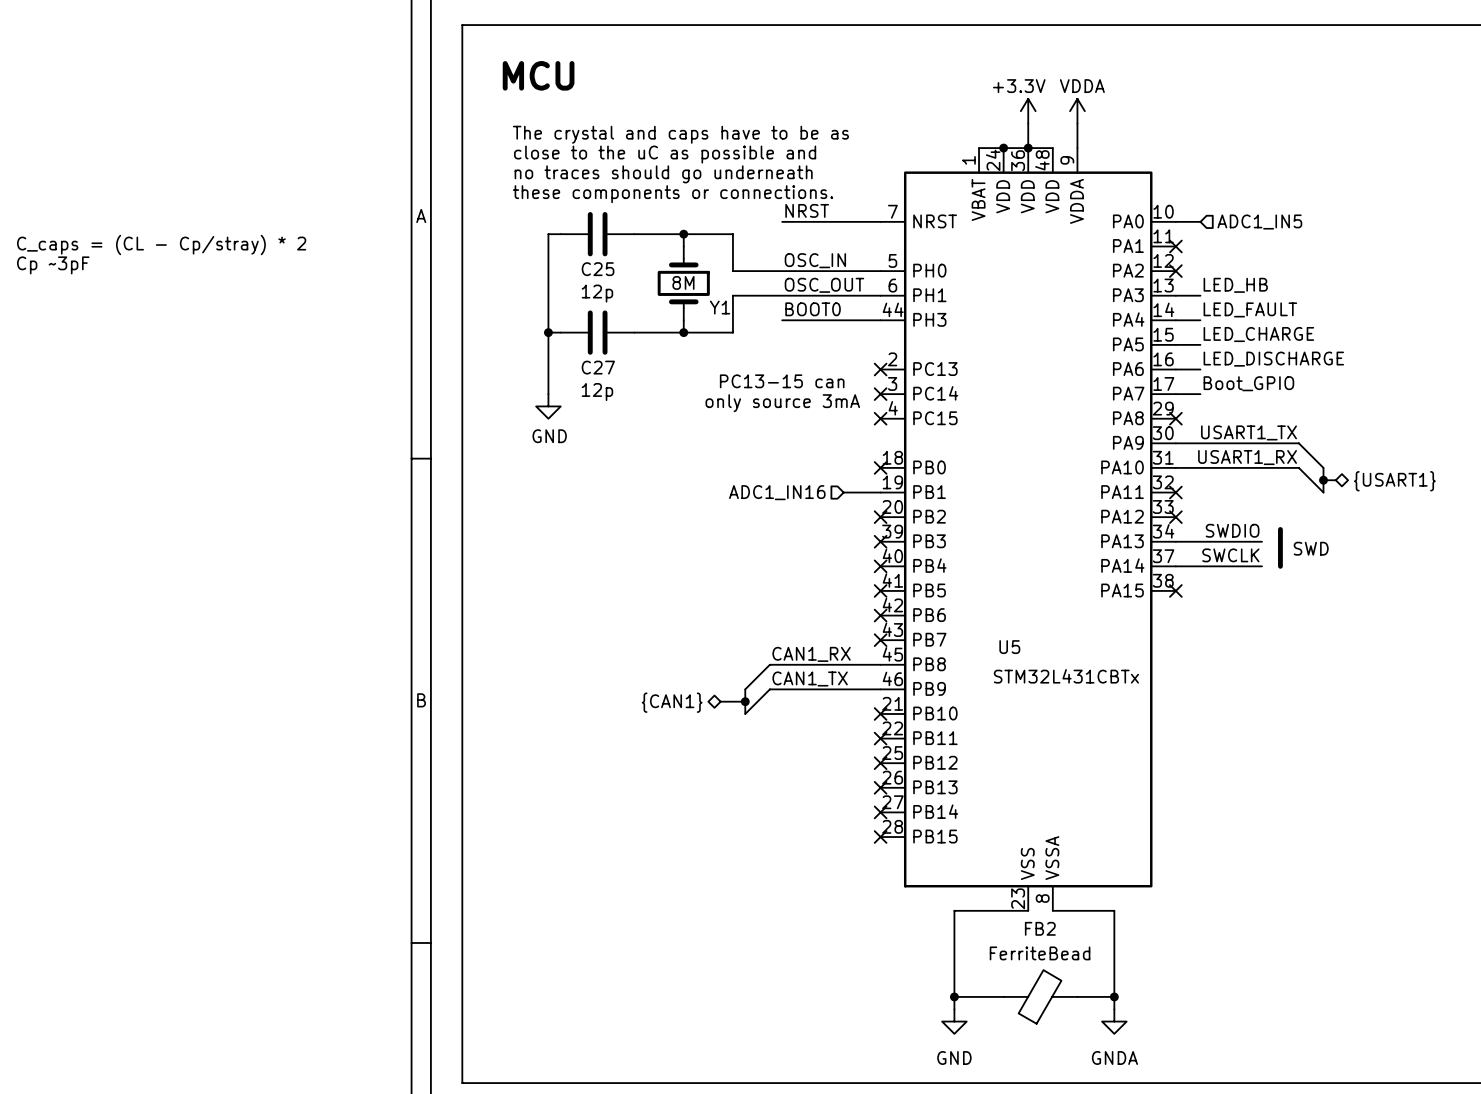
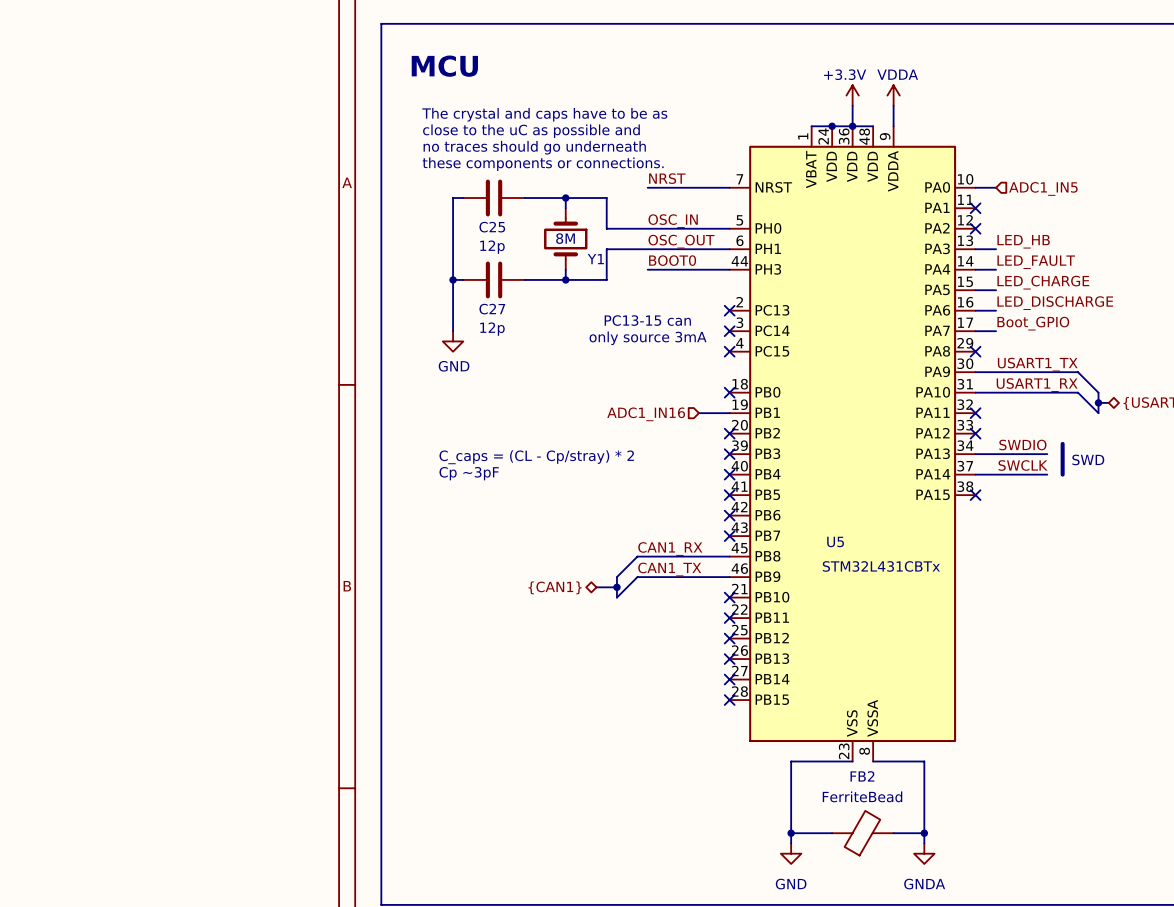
text: C_caps = (CL - Cp/stray) * 2 (161, 245) -> none
text: Cp ~3pF (53, 265) -> none
text: none -> C_caps = (CL - Cp/stray) * 2 (536, 457)
text: none -> Cp ~3pF (469, 473)

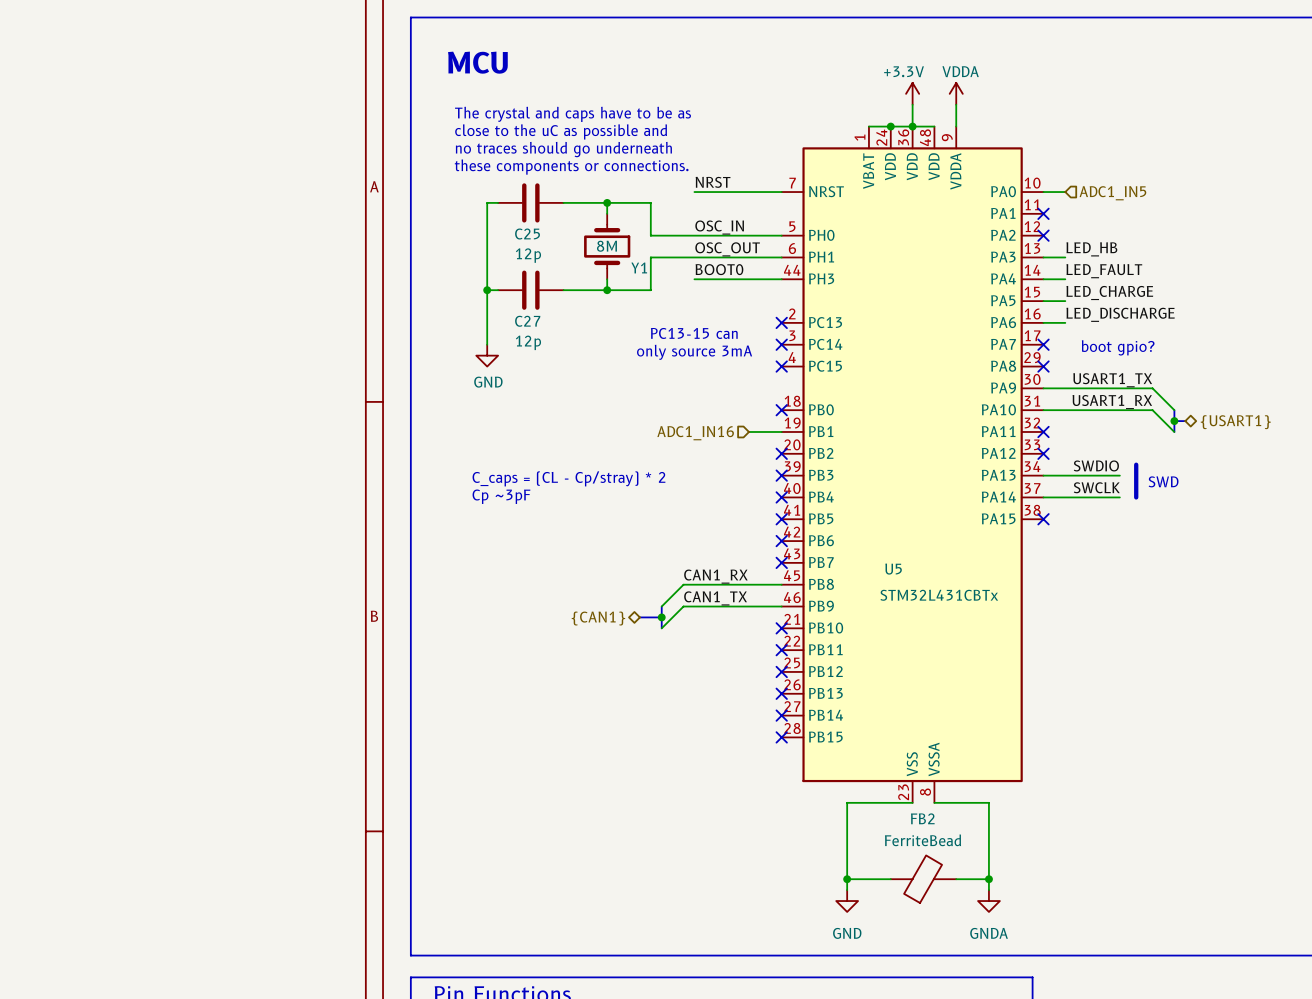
label: Boot_GPIO (1033, 323) -> none
wire: (975, 331) (996, 331) -> none
no-connect mark: none -> (1043, 344)
text: none -> boot gpio? (1118, 347)

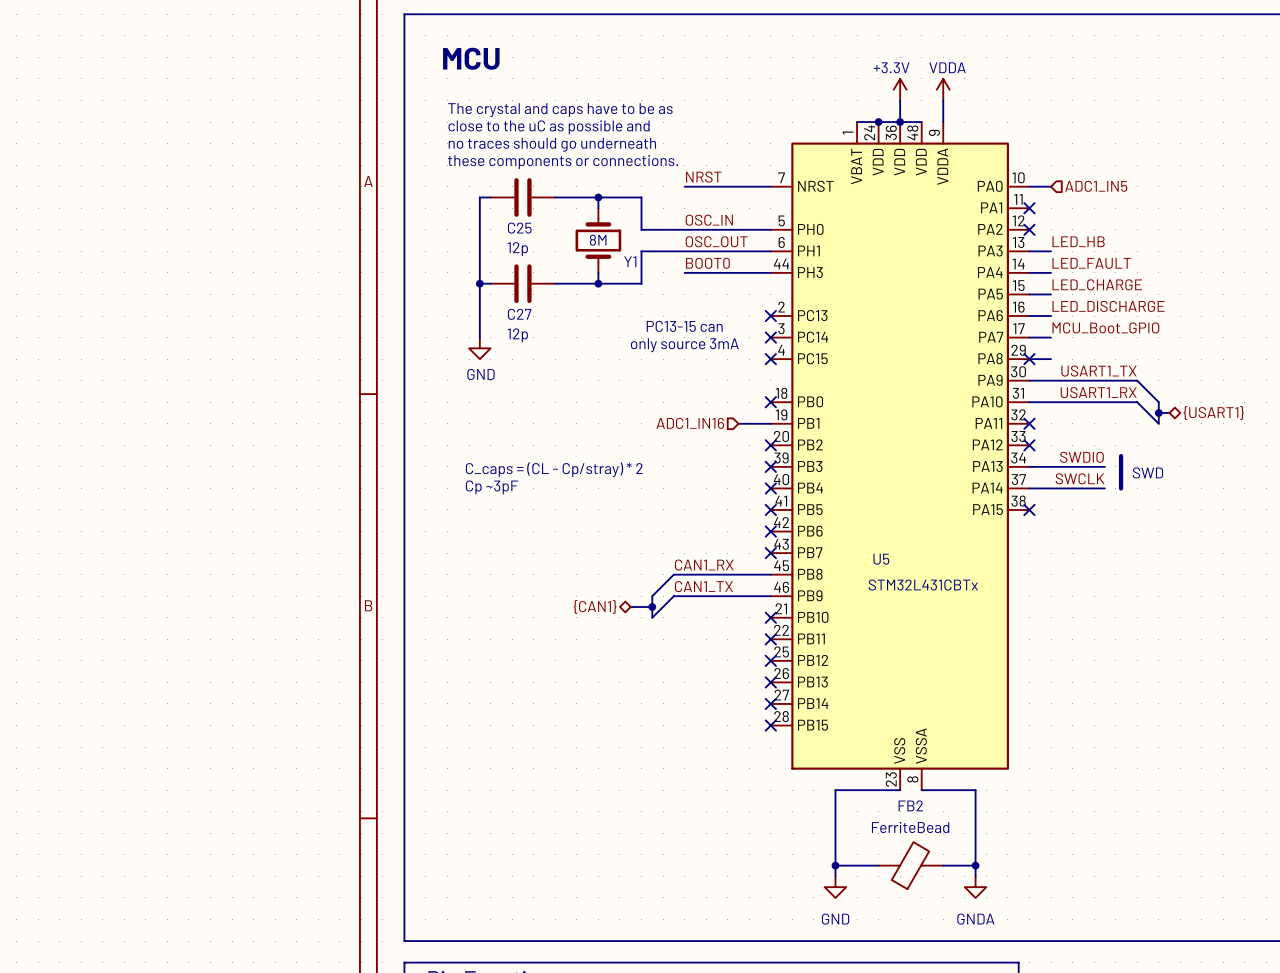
label: none -> MCU_Boot_GPIO (1105, 327)
wire: none -> (1029, 337) (1051, 337)
no-connect mark: (1043, 344) -> none
text: boot gpio? (1118, 347) -> none
wire: none -> (1029, 359) (1051, 359)

